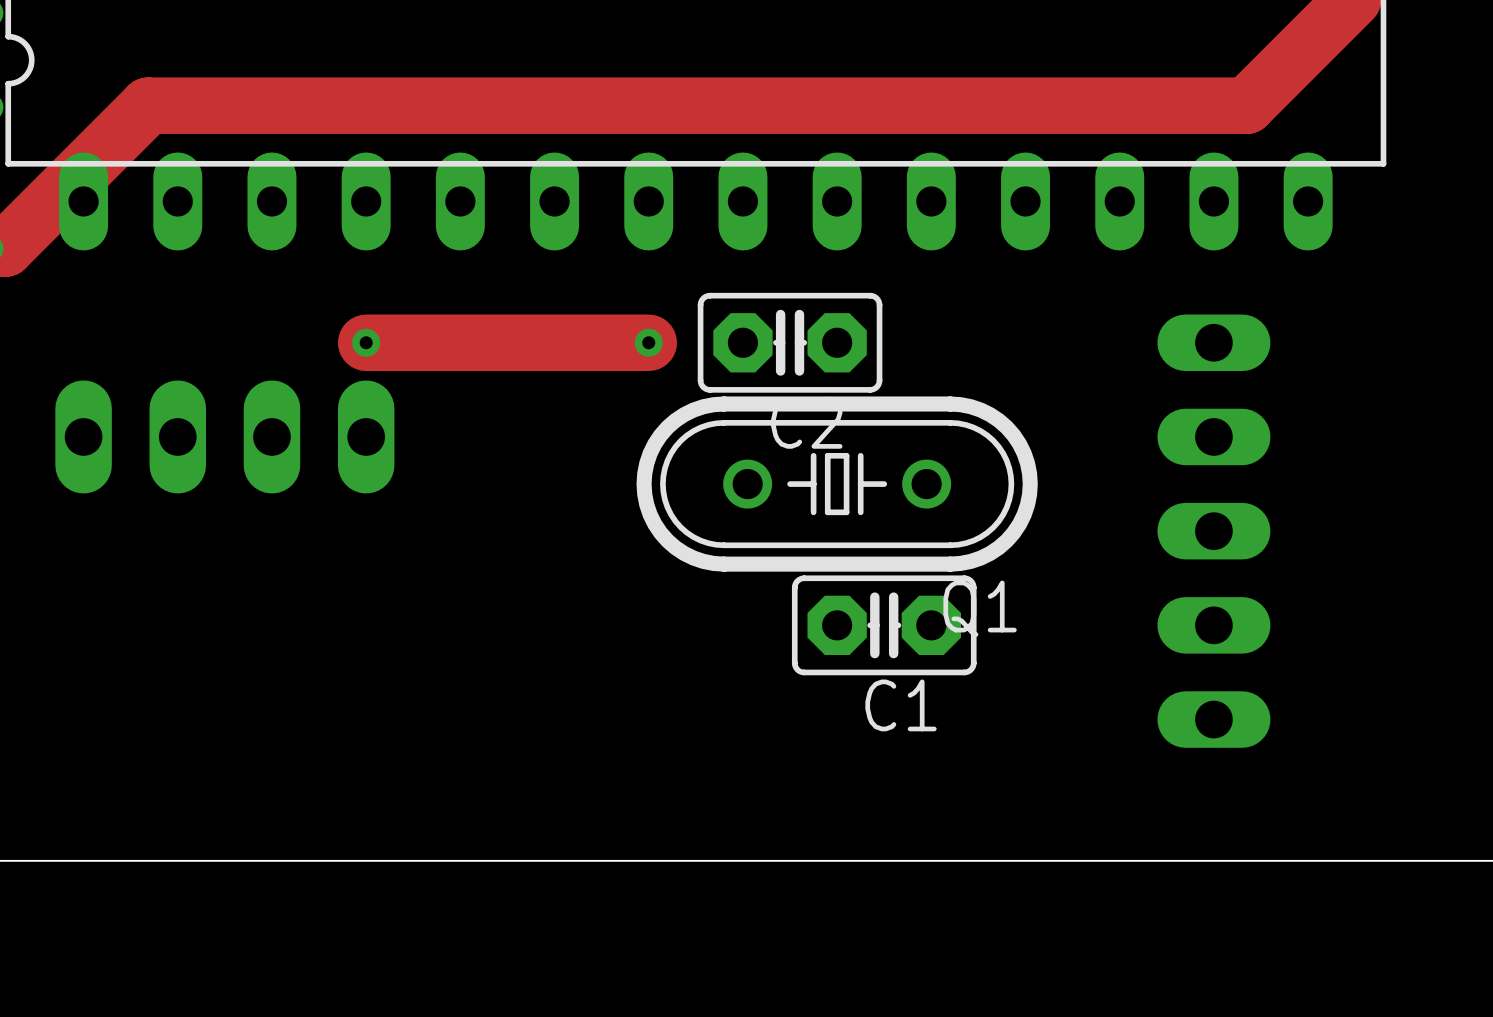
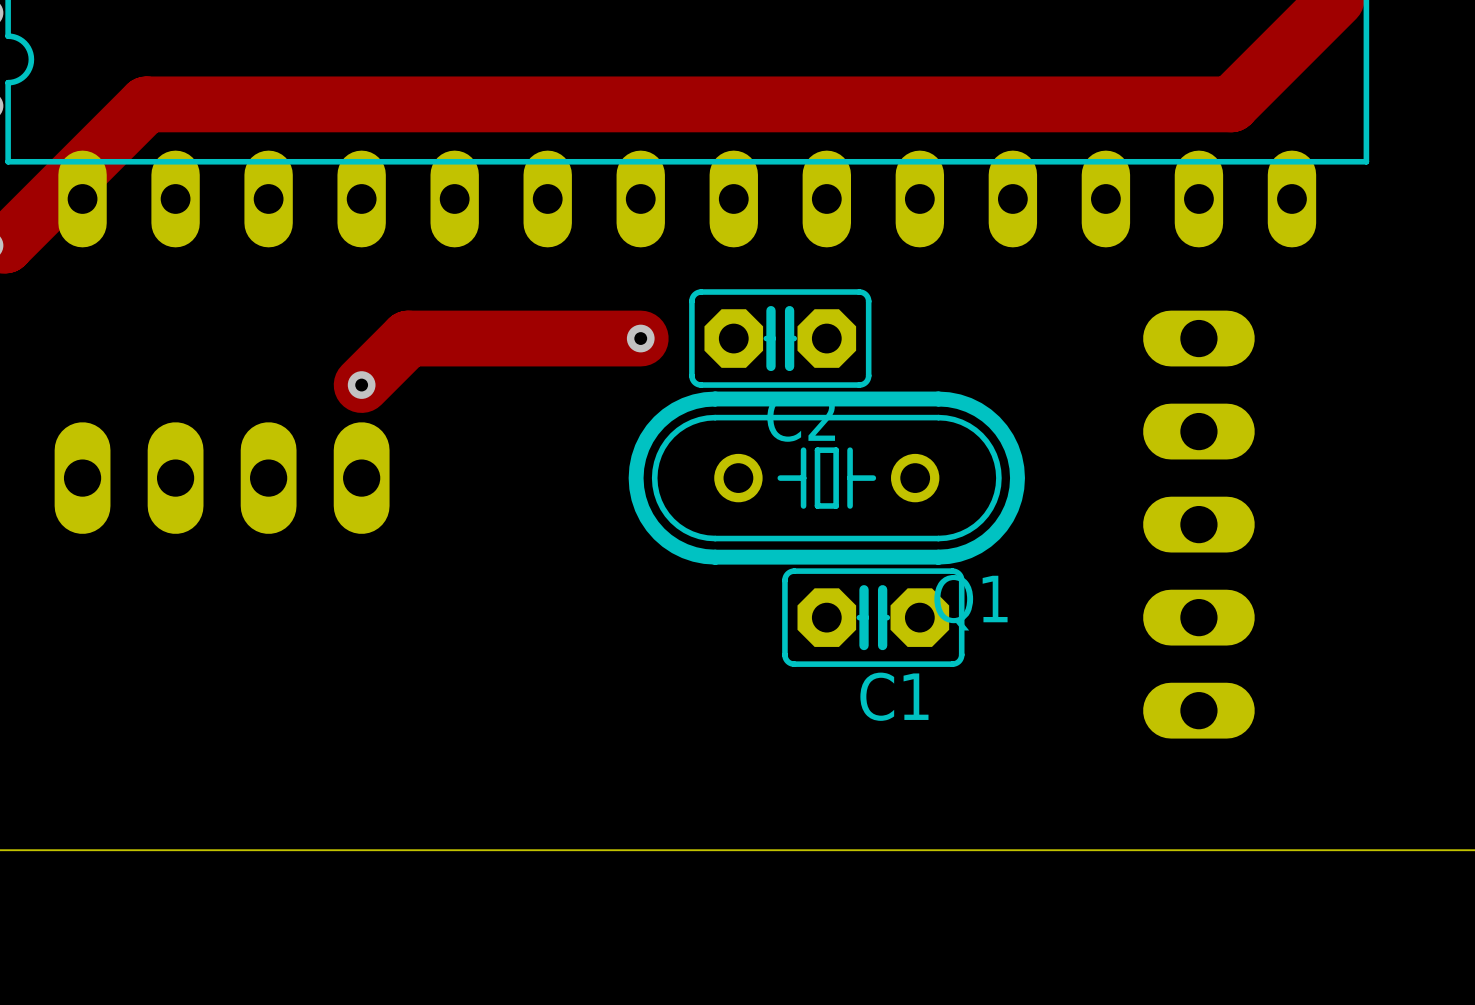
track: (366, 342) (413, 342) -> (361, 385) (408, 338)
via position: (366, 342) -> (361, 385)
part position: (224, 436) -> (222, 478)

